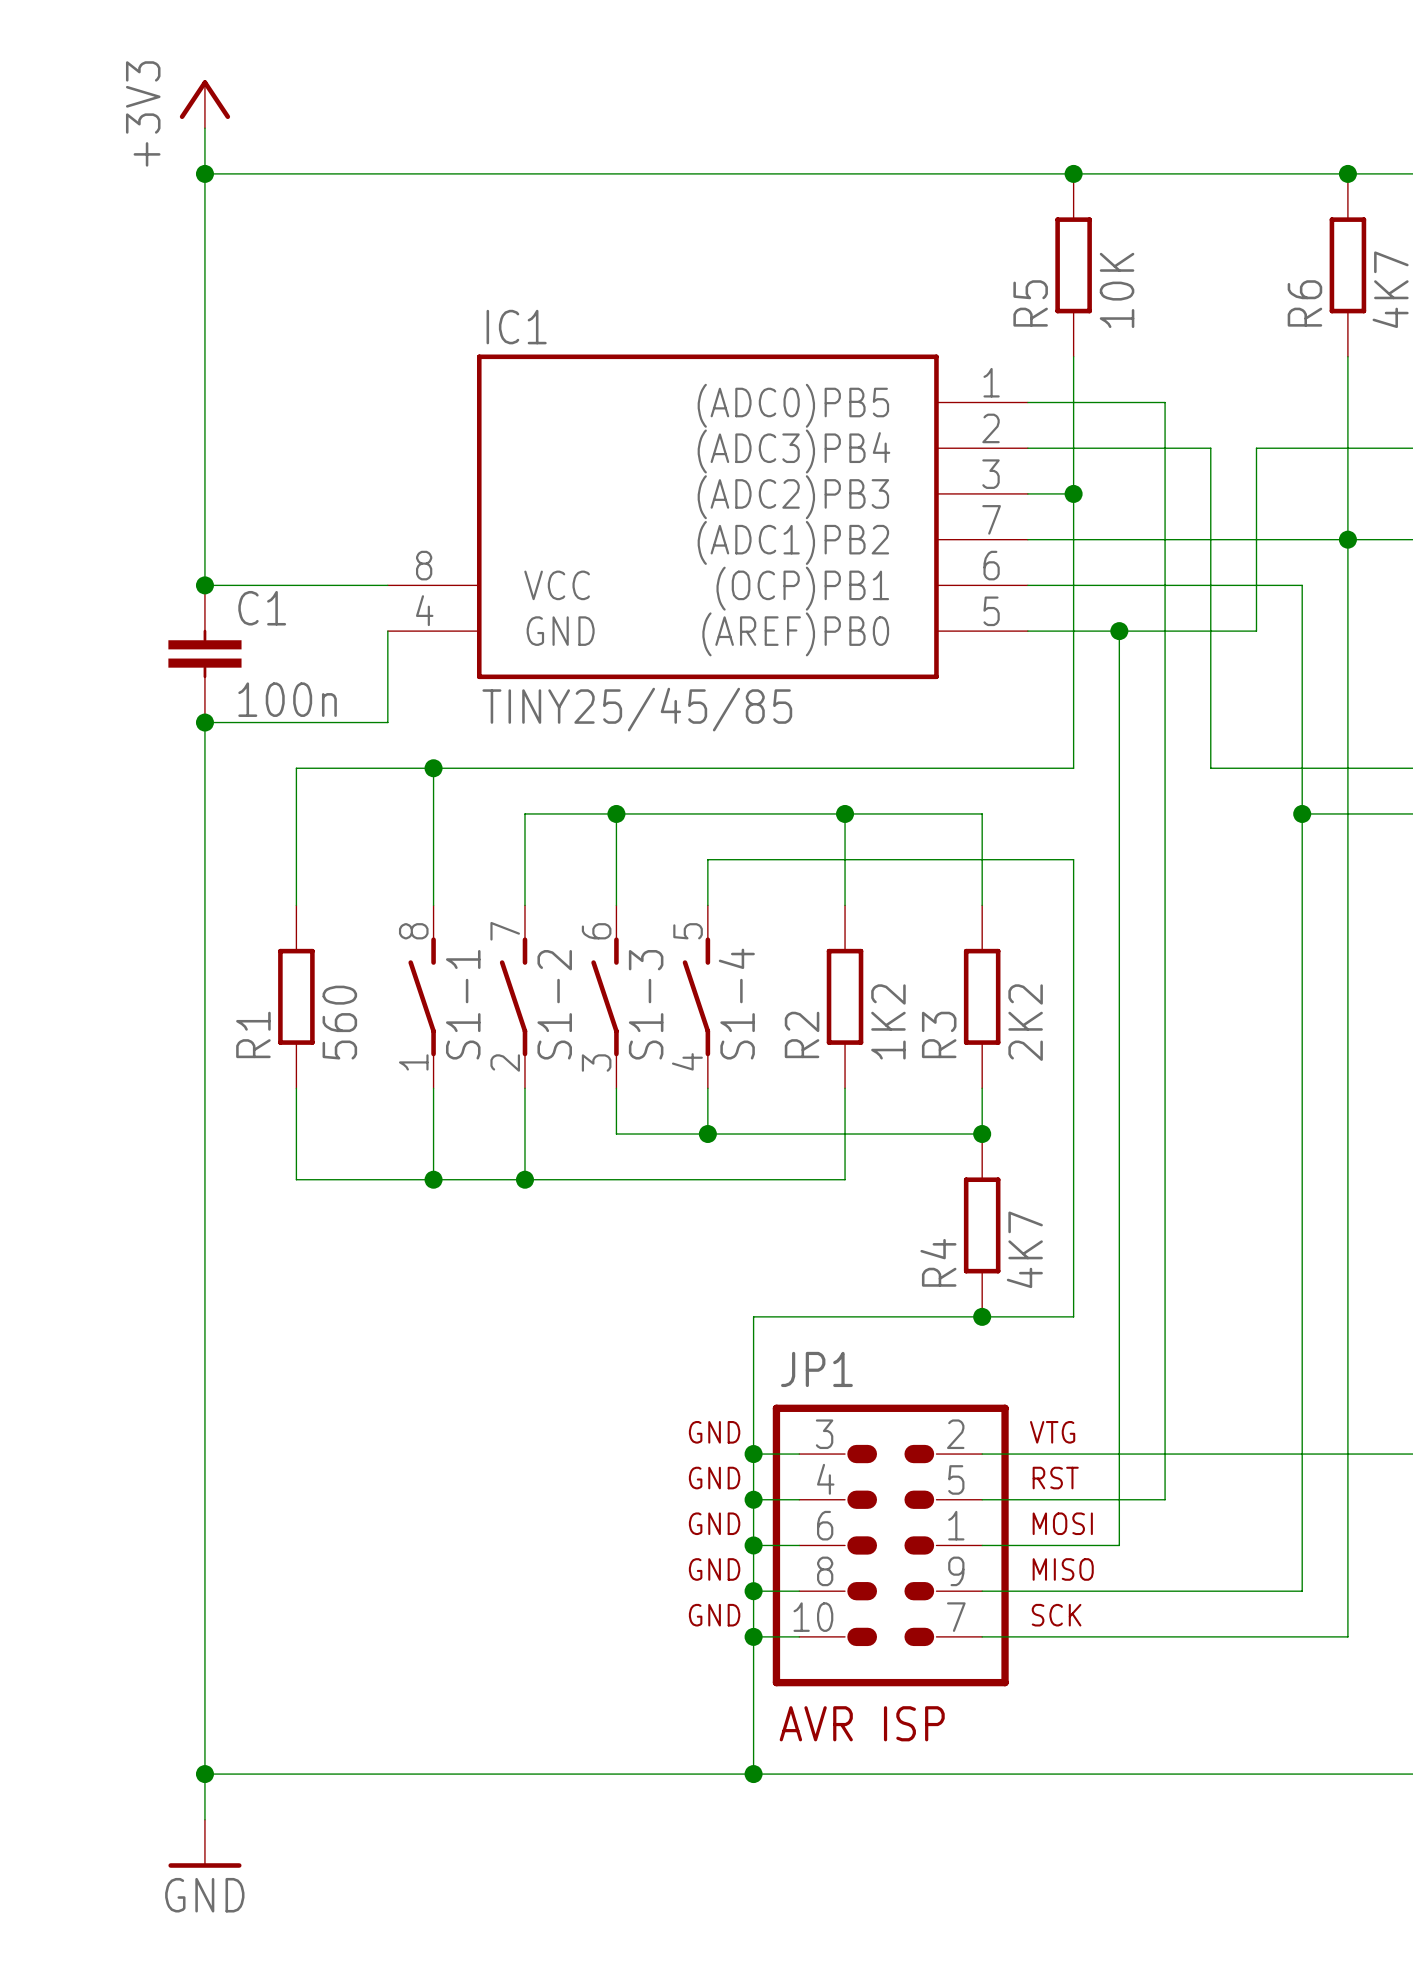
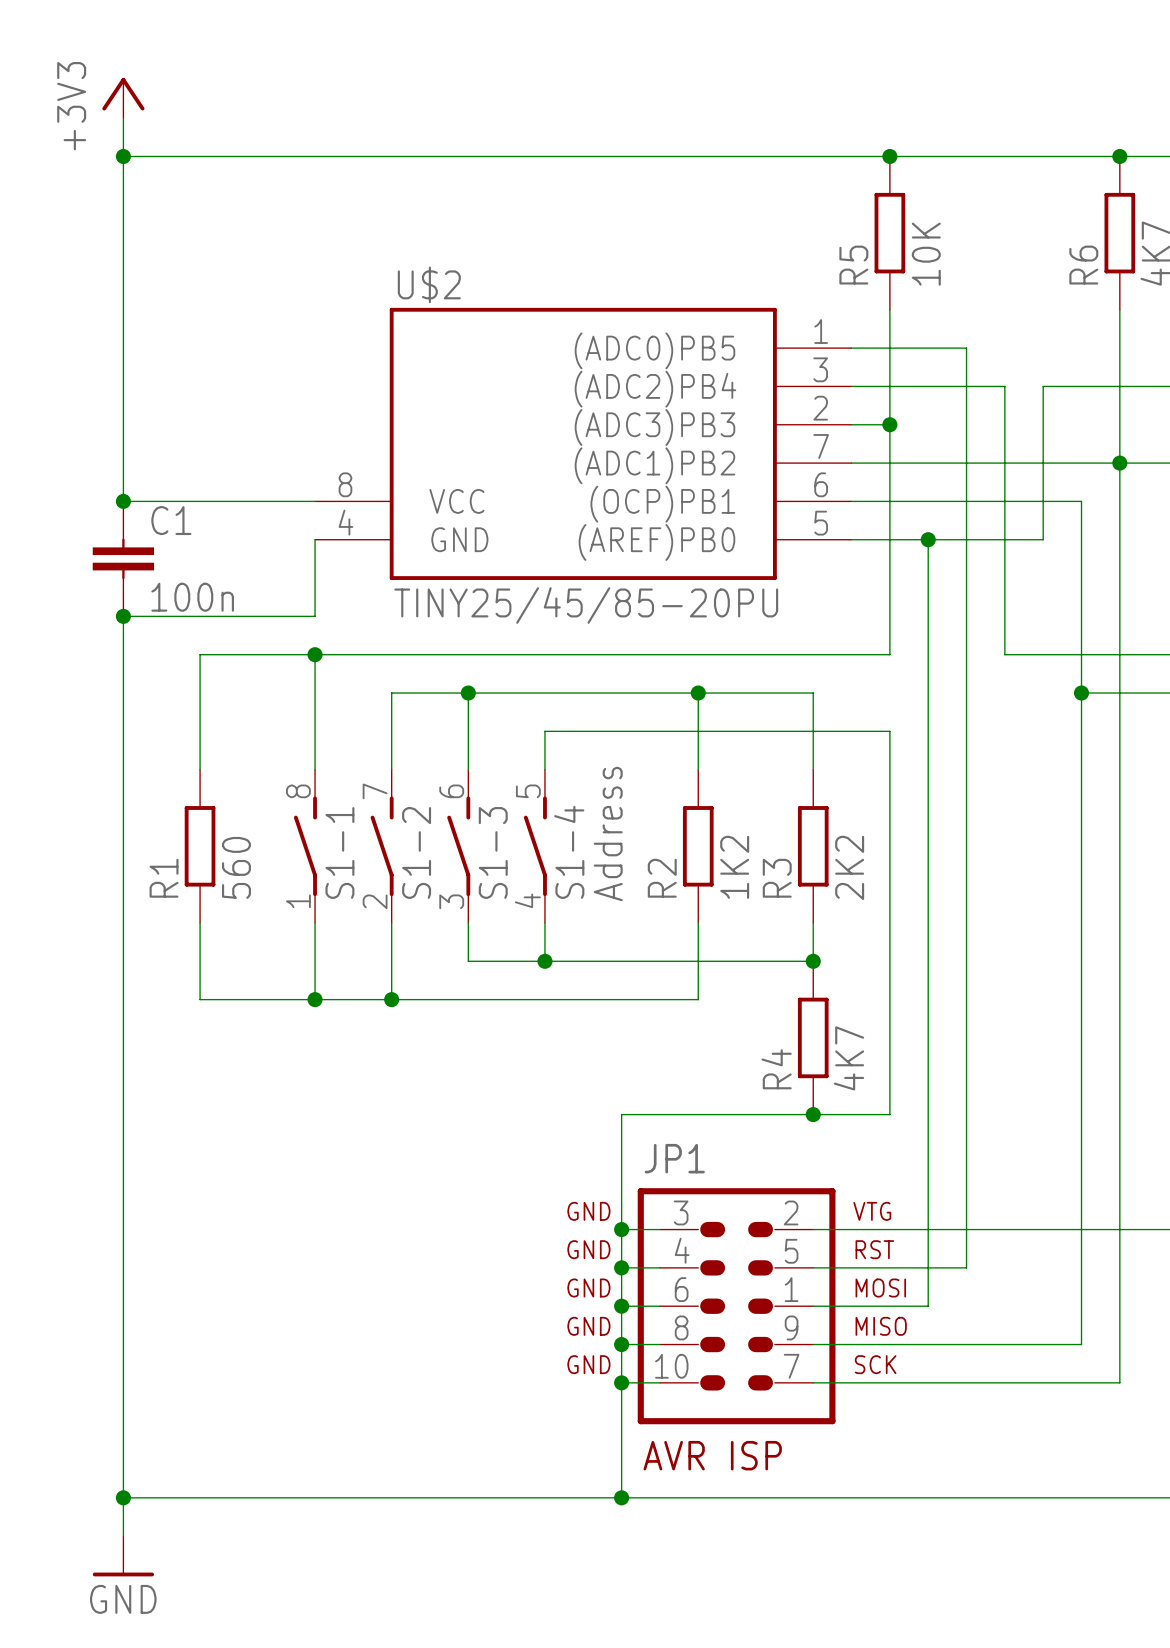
power symbol position: +3V3 (204, 104) -> +3V3 (123, 98)
wire: (204, 128) (204, 585) -> (123, 118) (123, 501) (161, 501)
wire: none -> (123, 156) (161, 156)
junction position: (204, 173) -> (123, 156)
IC1 name: IC1 (516, 327) -> U$2 (429, 284)
IC1 pin number: 2 (991, 428) -> 3 (820, 369)
IC1 pin name: (ADC3)PB4 (793, 451) -> (ADC2)PB4 (655, 389)
IC1 pin number: 3 (991, 474) -> 2 (820, 408)
IC1 pin name: (ADC2)PB3 (793, 497) -> (ADC3)PB3 (654, 427)
junction position: (204, 585) -> (123, 501)
C1 position: (204, 653) -> (123, 558)
IC1 value: TINY25/45/85 (637, 709) -> TINY25/45/85-20PU (586, 605)
wire: (204, 722) (204, 1819) -> (161, 616) (123, 616) (123, 1536)
junction position: (204, 722) -> (123, 616)
wire: (296, 768) (296, 905) -> (238, 654) (200, 654) (200, 769)
wire: (433, 768) (433, 905) -> (315, 654) (315, 769)
junction position: (433, 768) -> (315, 654)
wire: (524, 813) (524, 905) -> (430, 693) (391, 693) (391, 769)
wire: (616, 813) (616, 905) -> (468, 693) (468, 769)
junction position: (616, 813) -> (468, 693)
wire: (707, 859) (707, 905) -> (583, 731) (544, 731) (544, 769)
S1-4 value: none -> Address (608, 833)
R1 position: (296, 996) -> (200, 846)
S1-1 position: (422, 996) -> (305, 846)
S1-2 position: (513, 996) -> (382, 846)
S1-3 position: (605, 996) -> (458, 846)
S1-4 position: (696, 996) -> (535, 846)
wire: (296, 1088) (296, 1179) -> (200, 922) (200, 999) (238, 999)
wire: (433, 1088) (433, 1179) -> (315, 922) (315, 999)
wire: (524, 1088) (524, 1179) -> (391, 922) (391, 999)
wire: (616, 1088) (616, 1134) -> (468, 922) (468, 961) (506, 961)
wire: (707, 1088) (707, 1134) -> (544, 922) (544, 961)
junction position: (707, 1134) -> (544, 961)
junction: none -> (315, 999)
junction: (433, 1179) -> none
junction: none -> (391, 999)
junction: (524, 1179) -> none
wire: none -> (123, 1497) (161, 1497)
junction position: (204, 1774) -> (123, 1497)
power symbol position: GND (204, 1843) -> GND (123, 1556)

